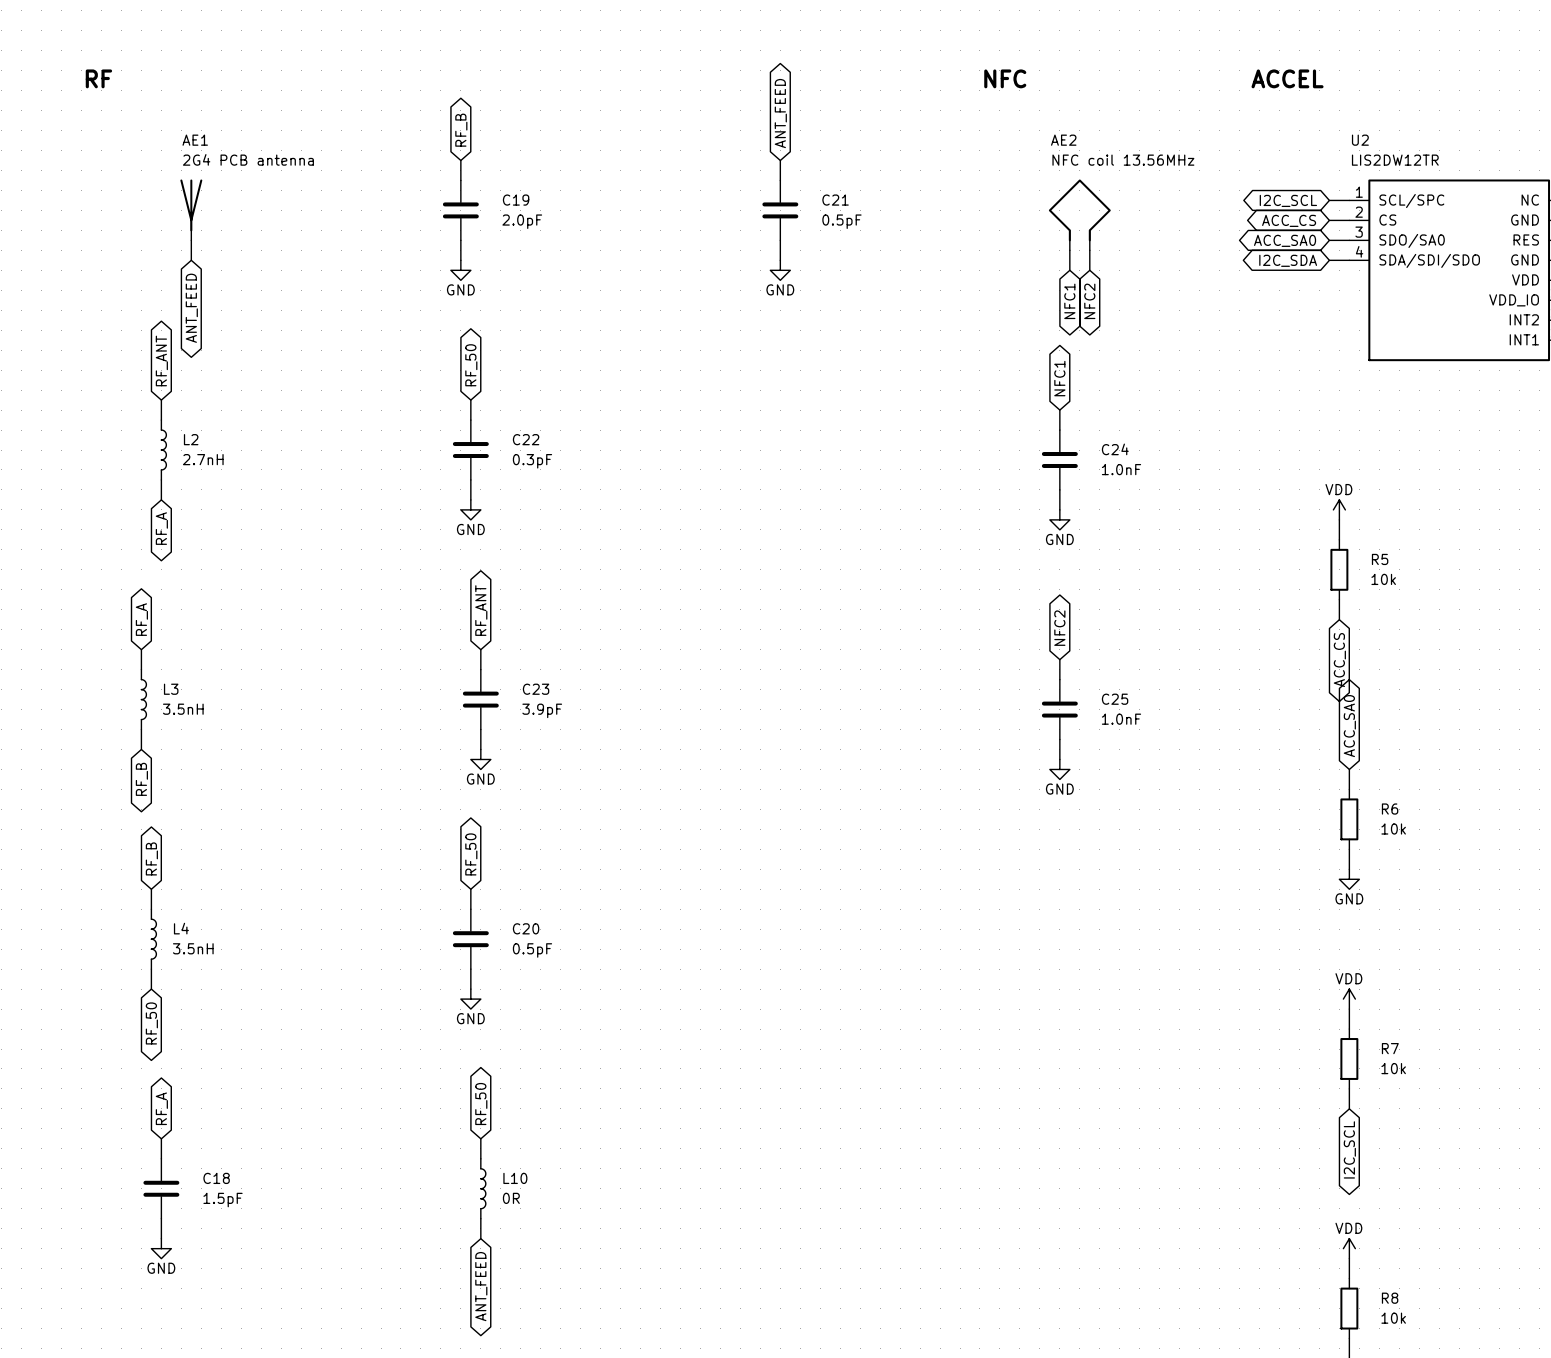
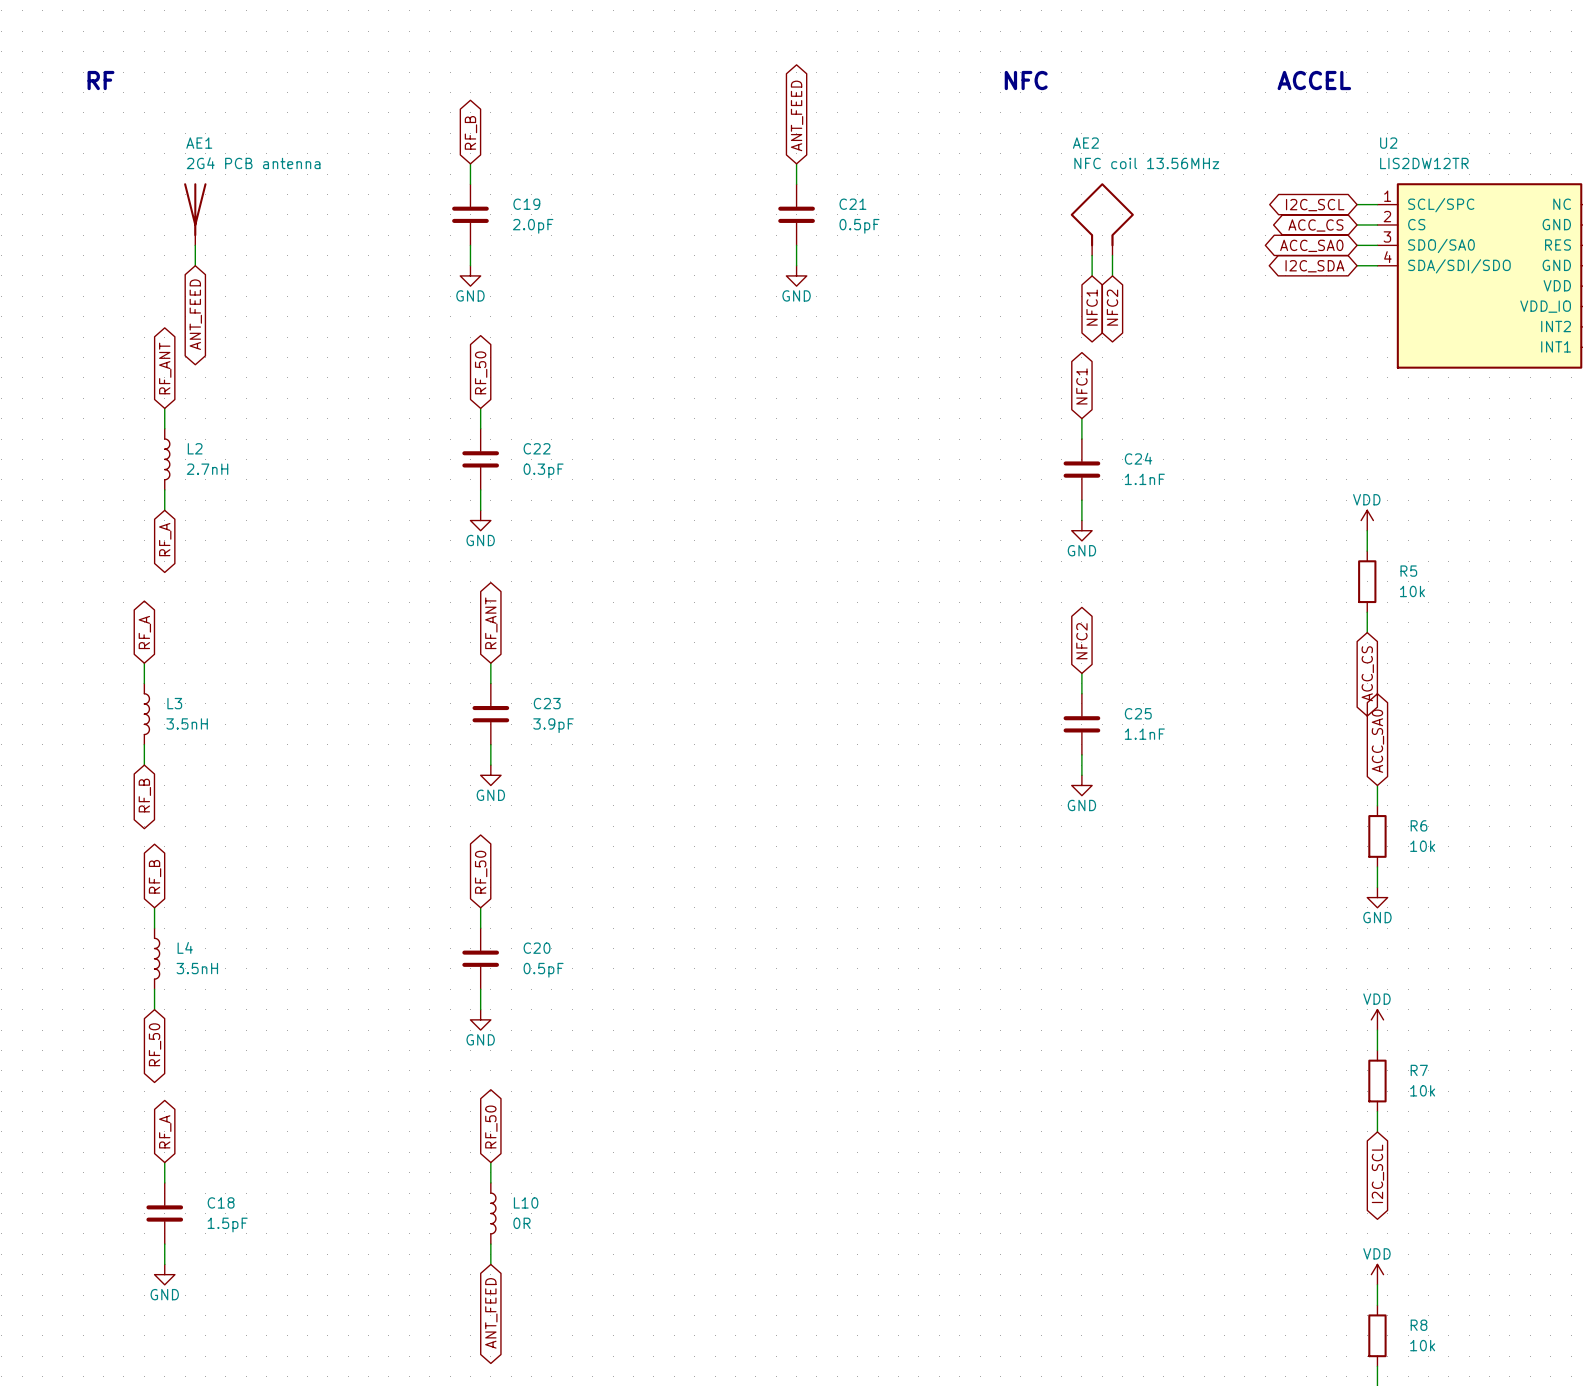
C24 value: 1.0nF (1121, 469) -> 1.1nF (1144, 479)
C25 value: 1.0nF (1121, 719) -> 1.1nF (1144, 734)

